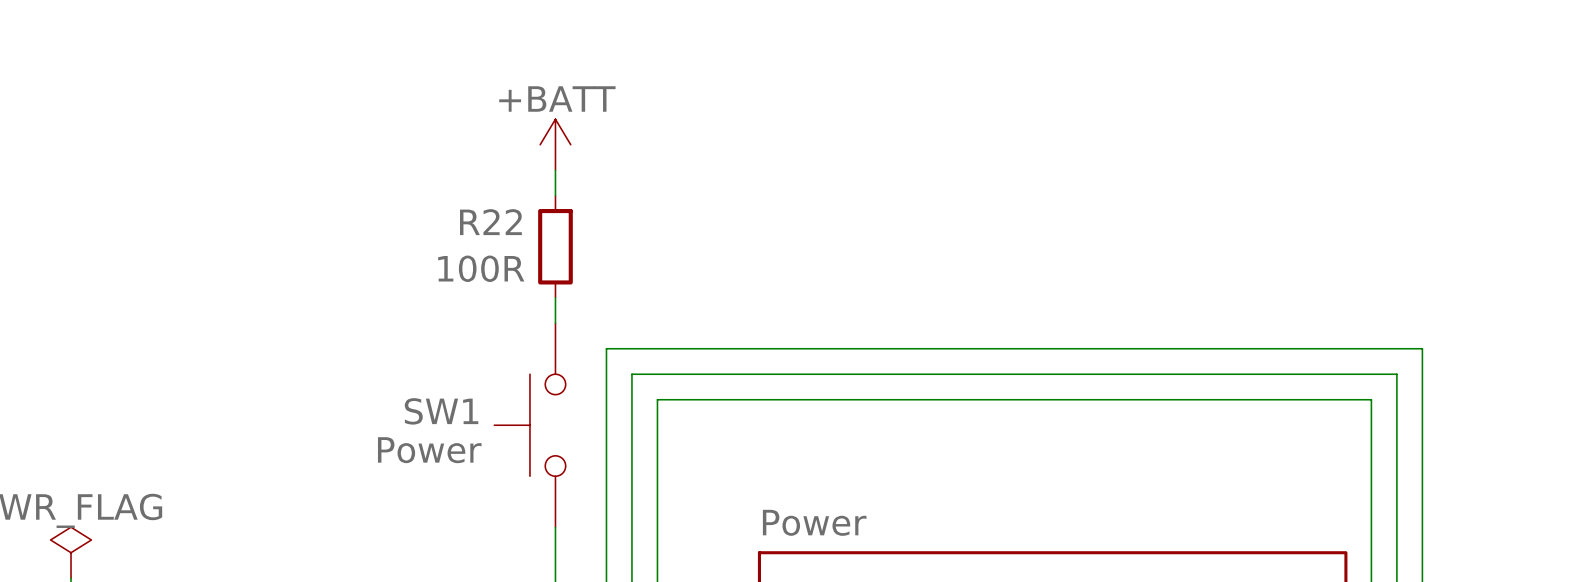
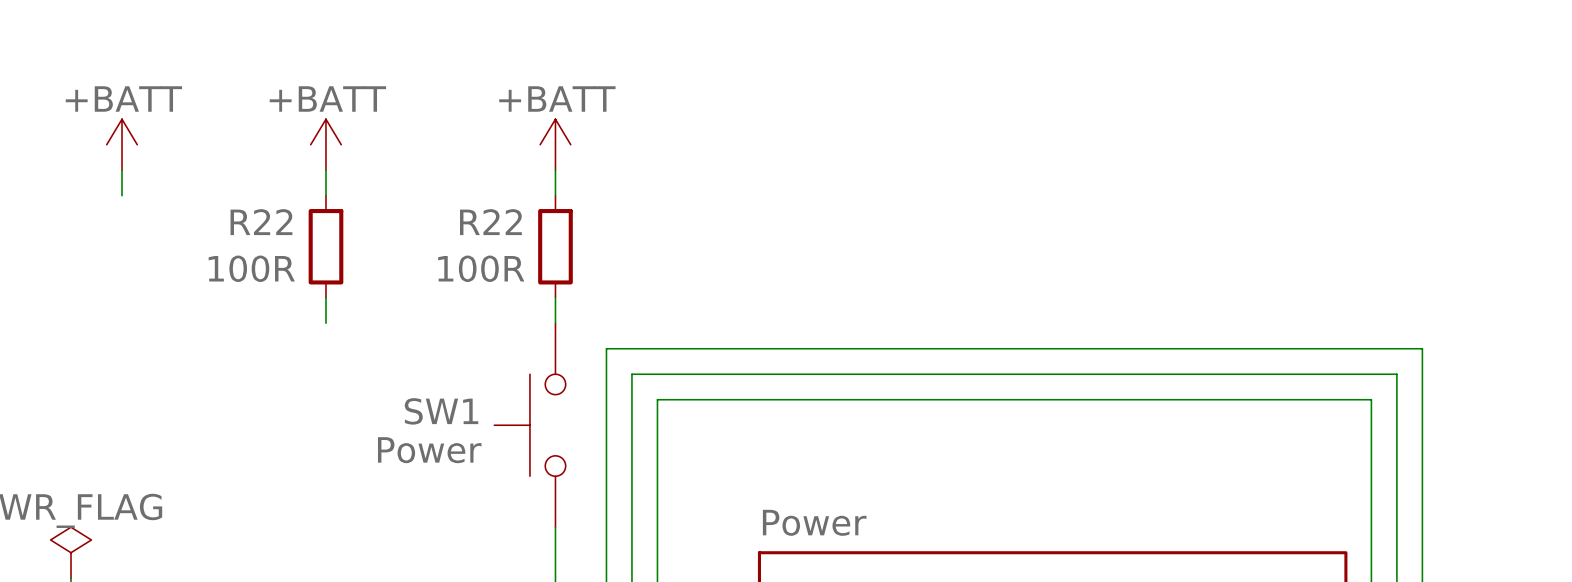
power symbol: none -> +BATT (122, 144)
power symbol: none -> +BATT (325, 144)
wire: none -> (122, 170) (122, 195)
wire: none -> (325, 170) (325, 195)
R22: none -> 100R (325, 246)
wire: none -> (325, 297) (325, 323)

